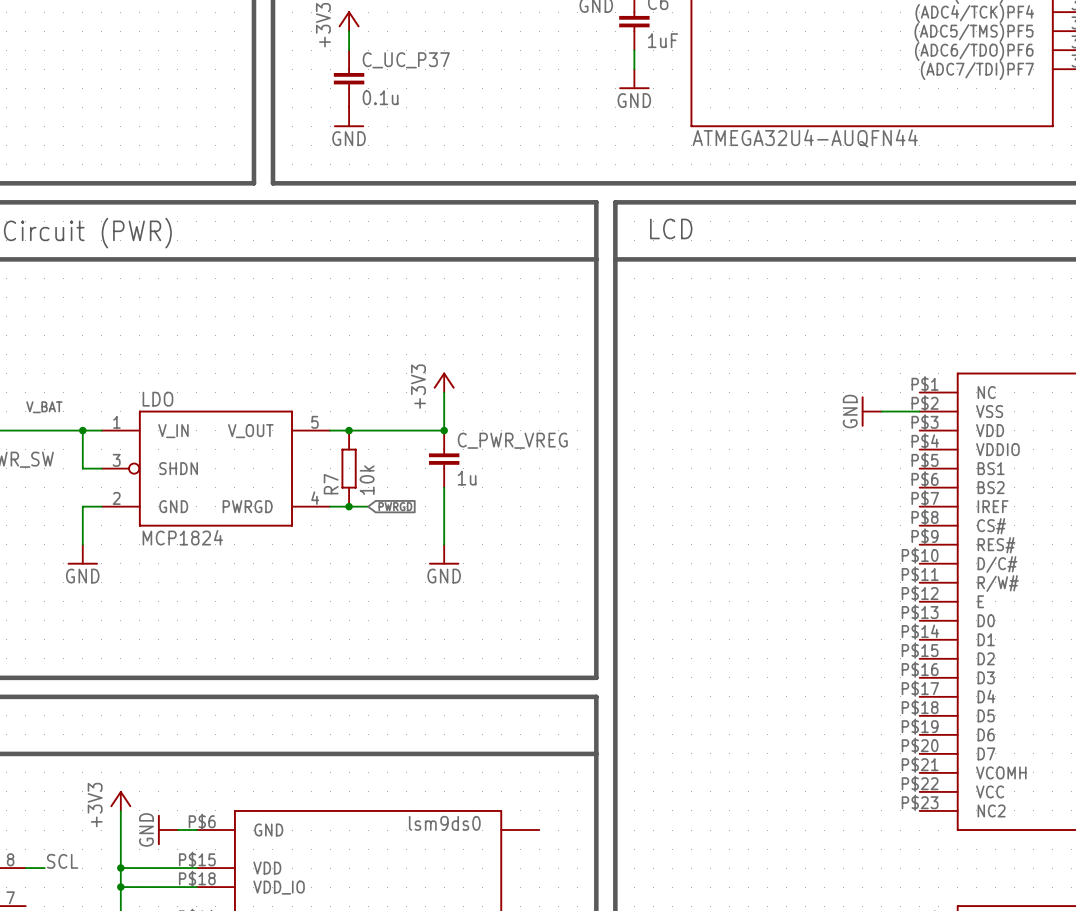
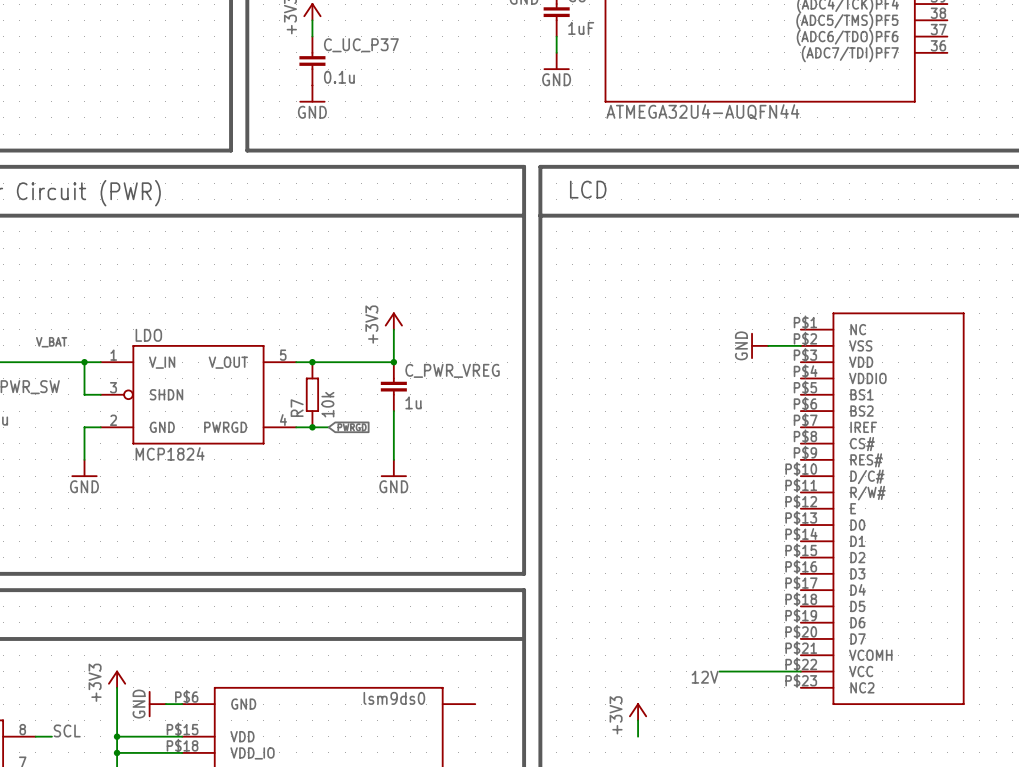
wire: none -> (719, 671) (800, 671)
label: none -> 12V (705, 677)
power symbol: none -> +3V3 (638, 711)
wire: none -> (638, 720) (638, 736)

